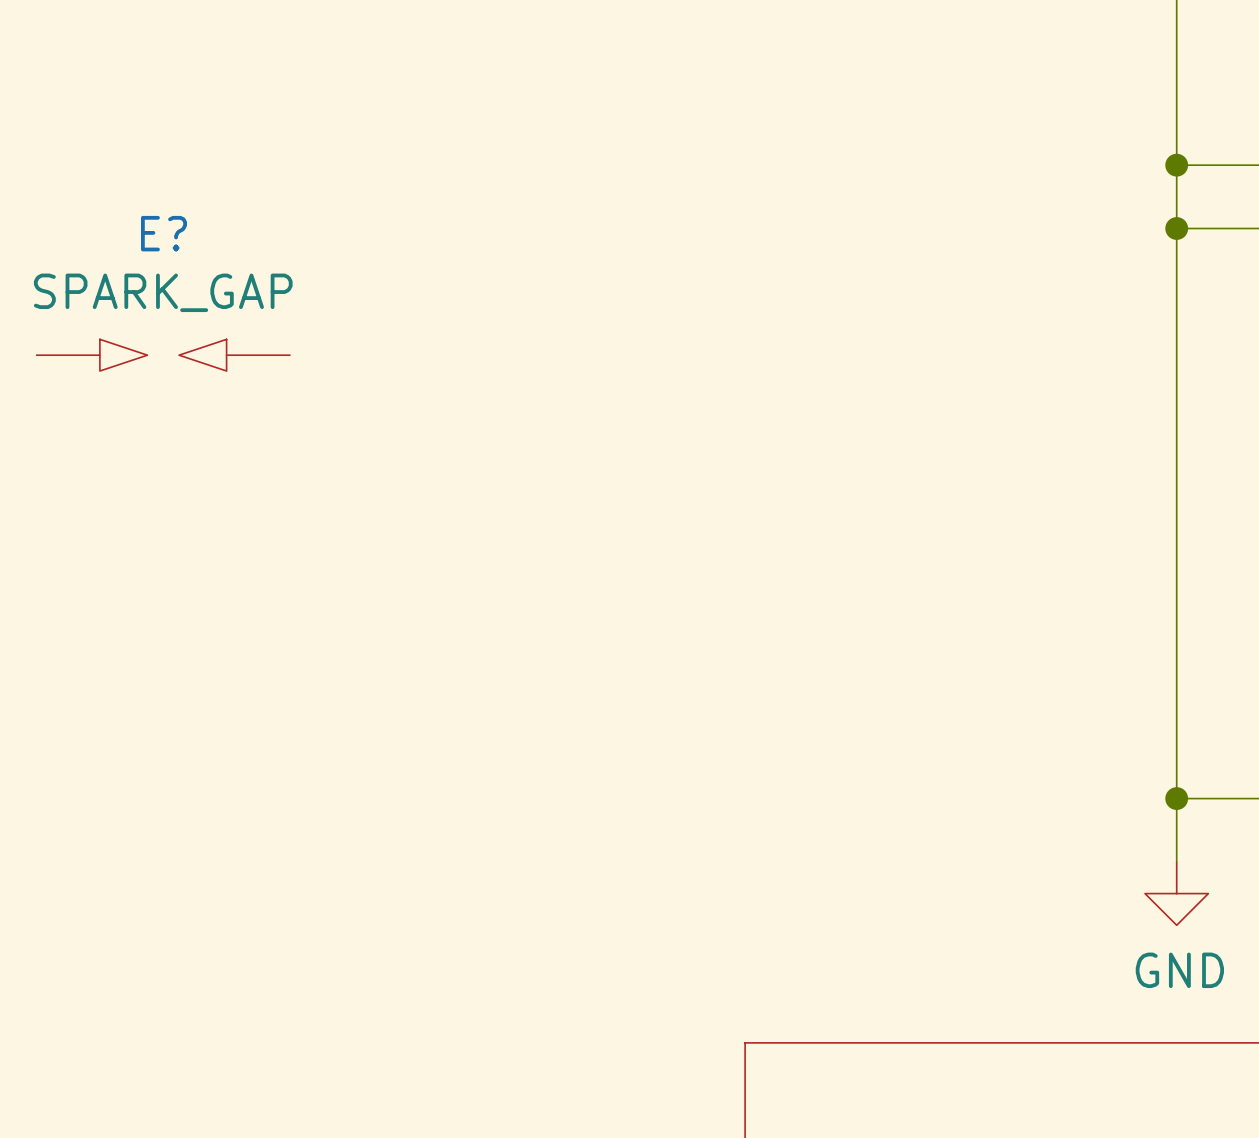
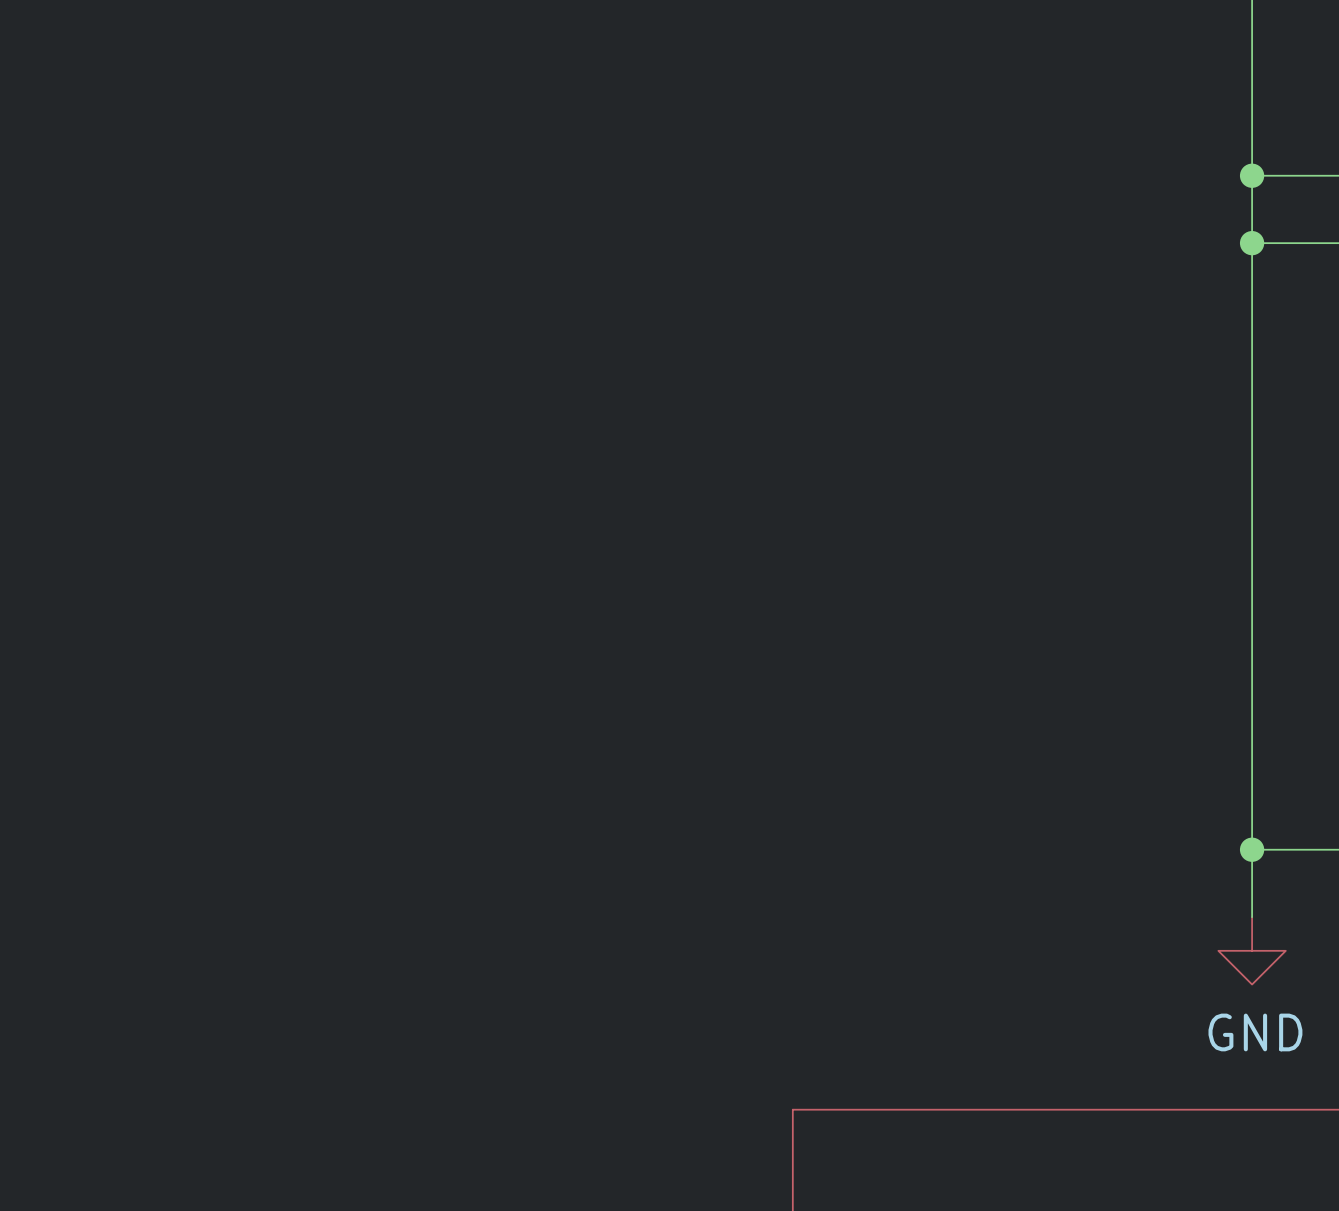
E?: SPARK_GAP (163, 355) -> none

